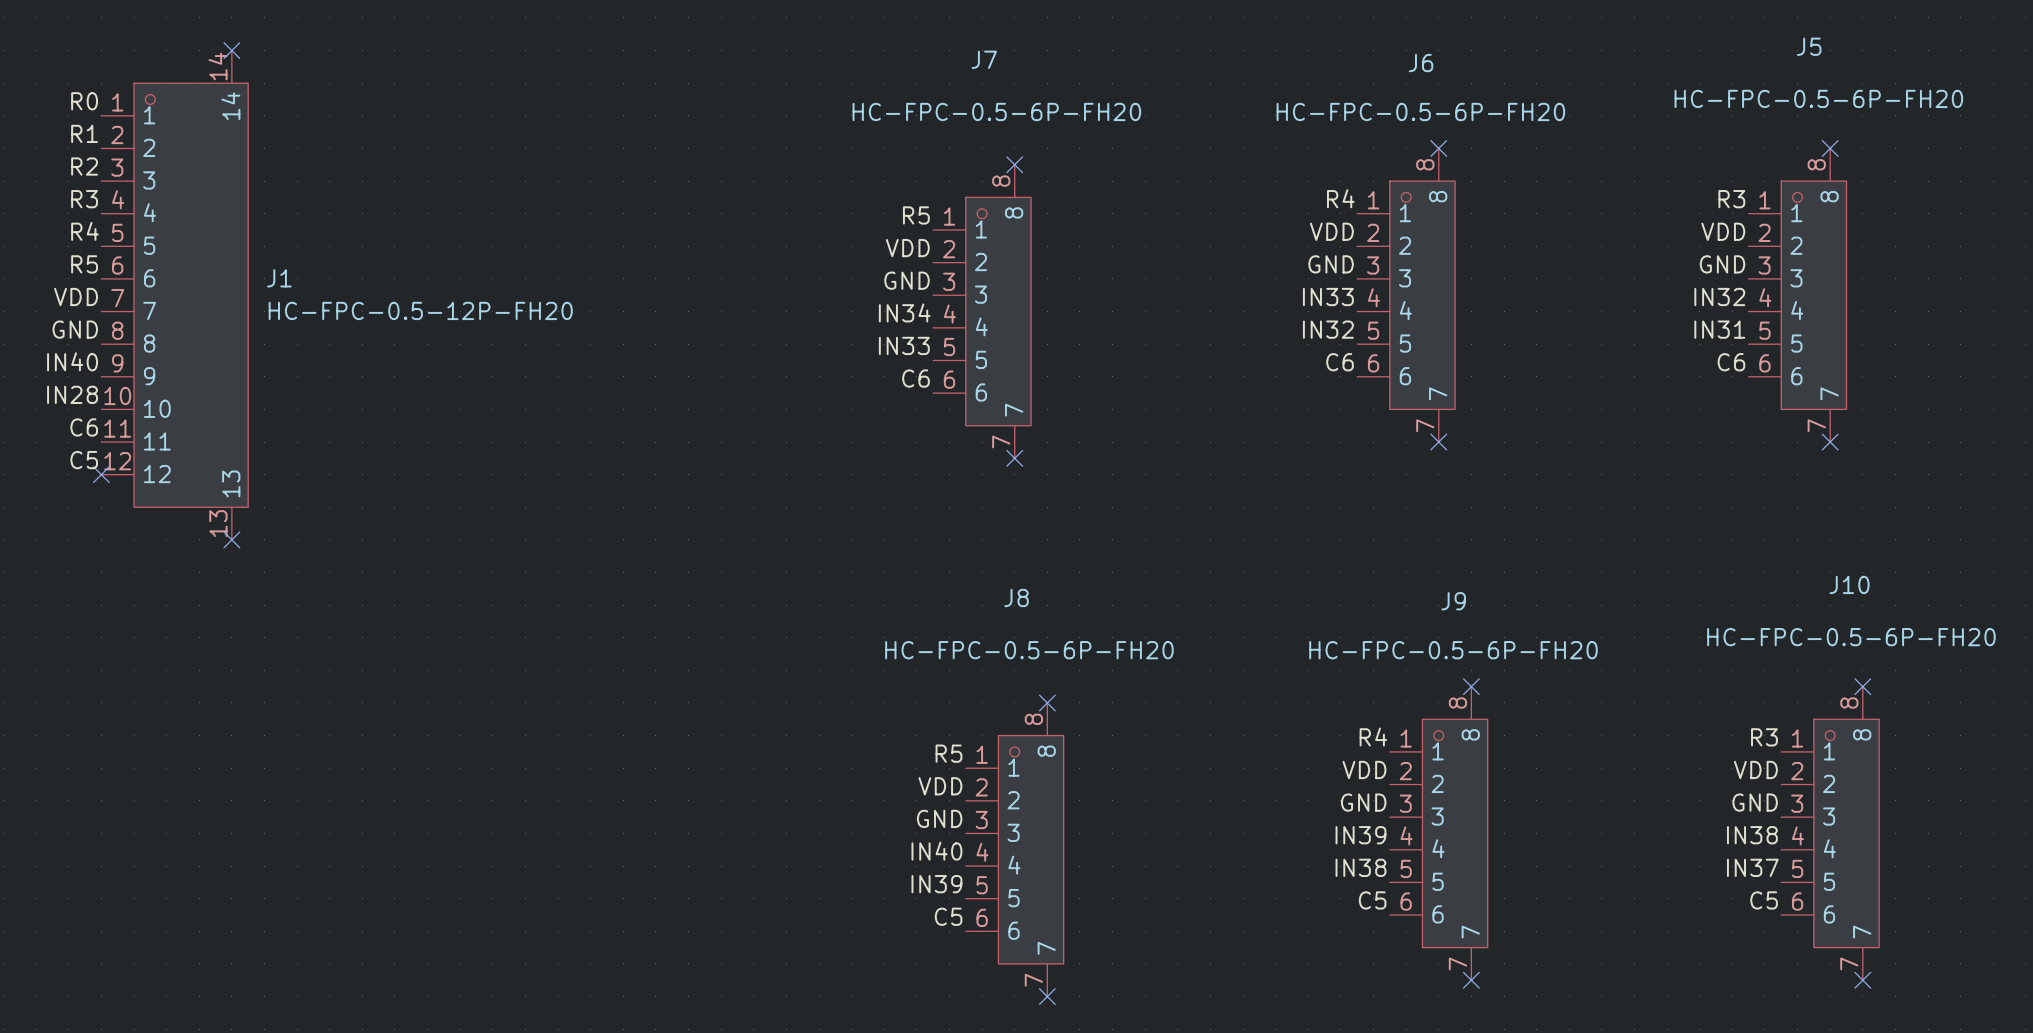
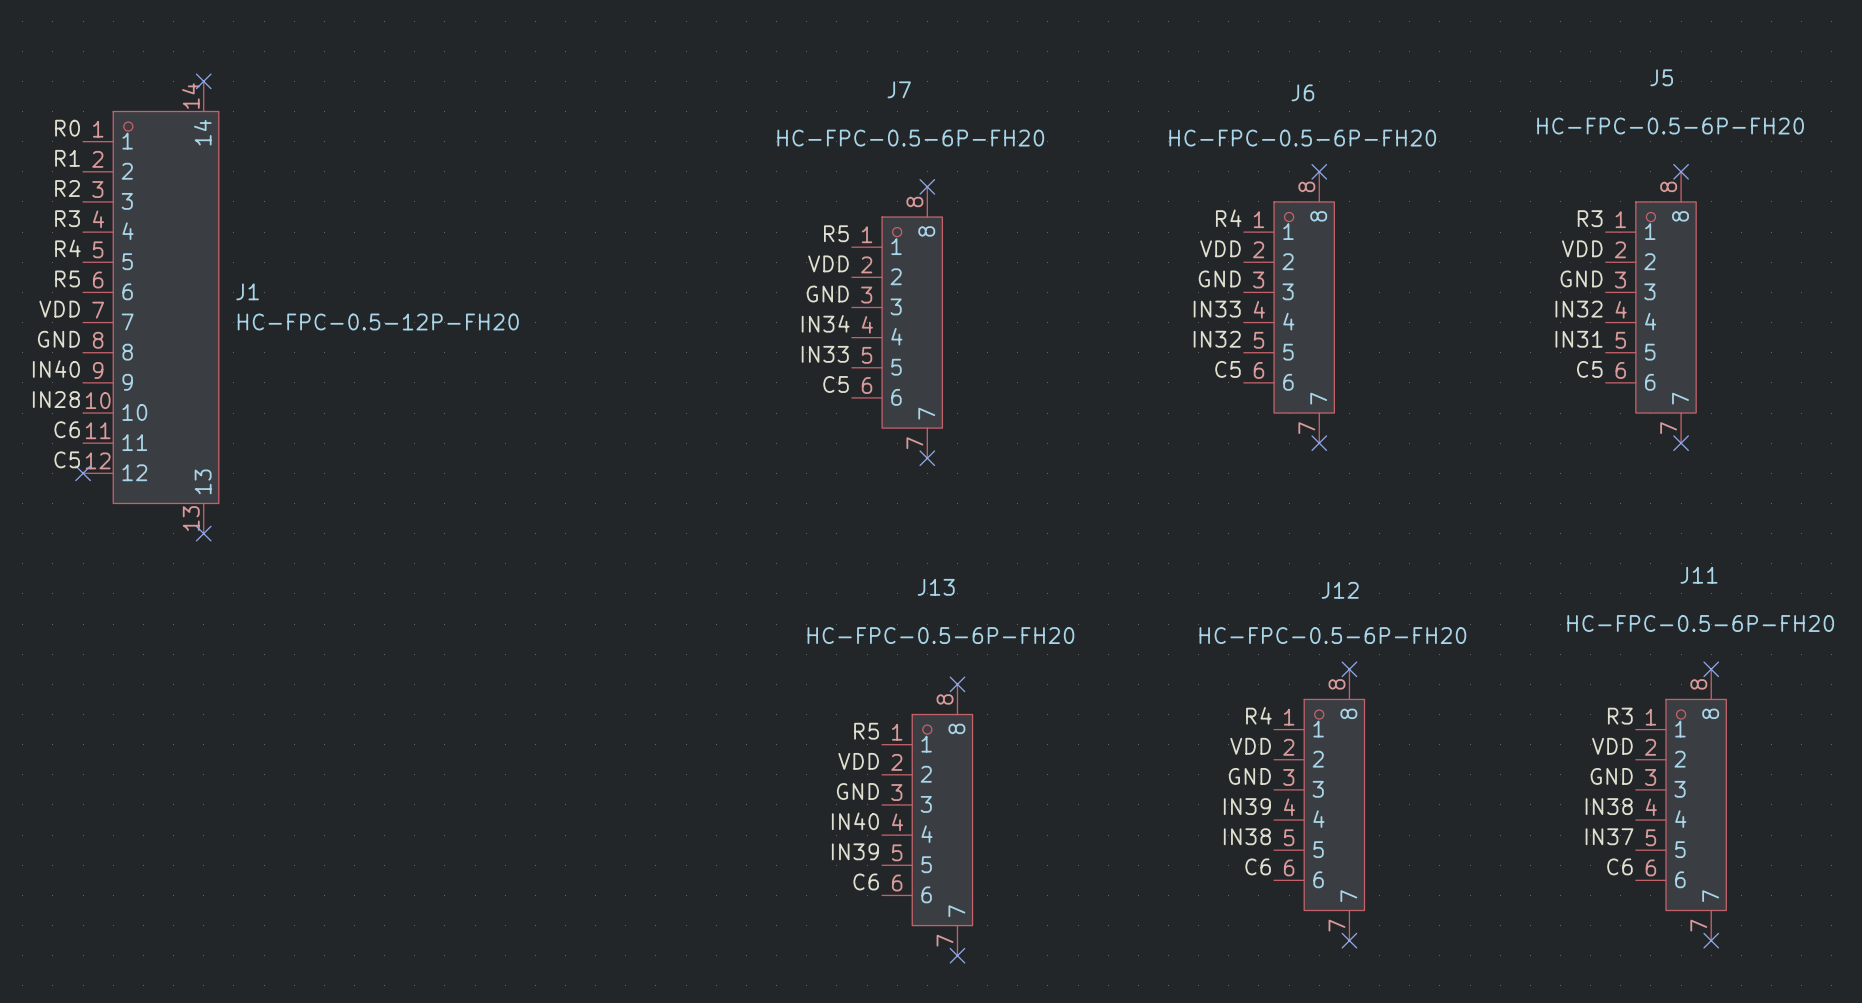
label: C6 (1340, 362) -> C5 (1227, 369)
label: C6 (1731, 362) -> C5 (1589, 369)
label: C6 (915, 378) -> C5 (836, 384)
J10 name: J10 (1849, 584) -> J11 (1699, 575)
J8 name: J8 (1016, 597) -> J13 (936, 587)
J9 name: J9 (1453, 601) -> J12 (1340, 590)
label: C5 (1372, 900) -> C6 (1258, 866)
label: C5 (1764, 900) -> C6 (1619, 866)
label: C5 (948, 916) -> C6 (866, 881)

